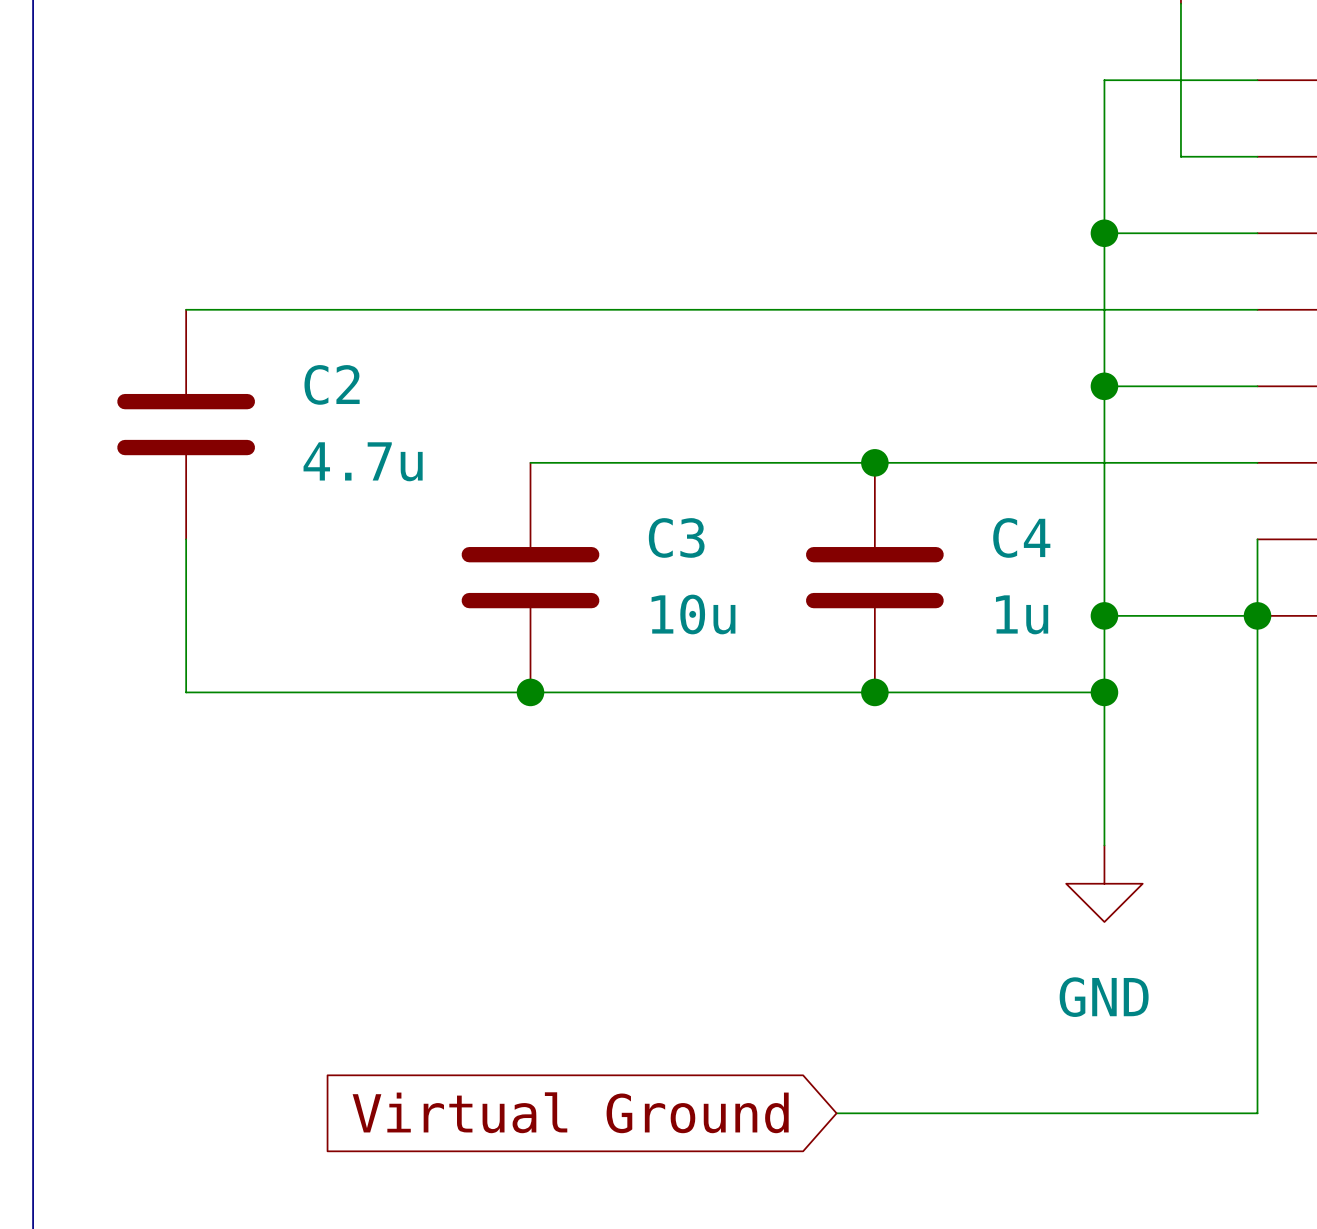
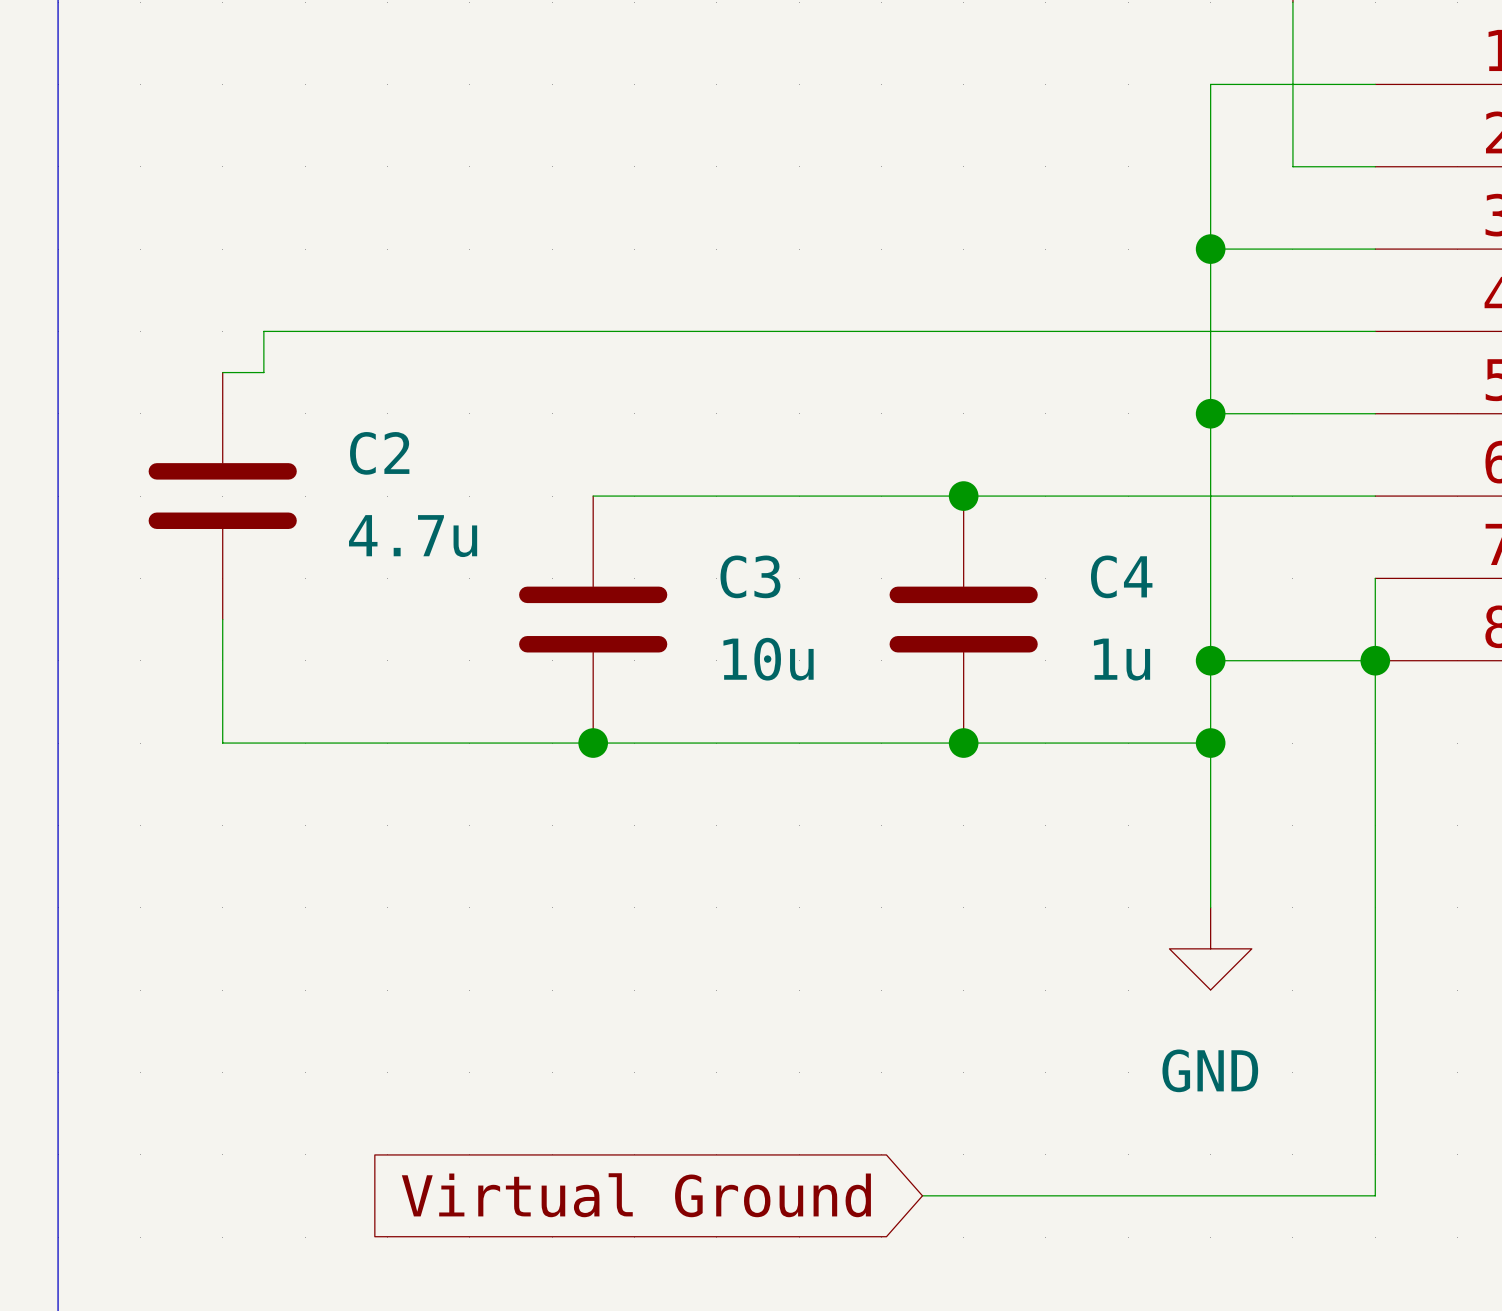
wire: (186, 309) (224, 309) -> (222, 372) (263, 372) (263, 331)
C2 position: (186, 424) -> (222, 496)

